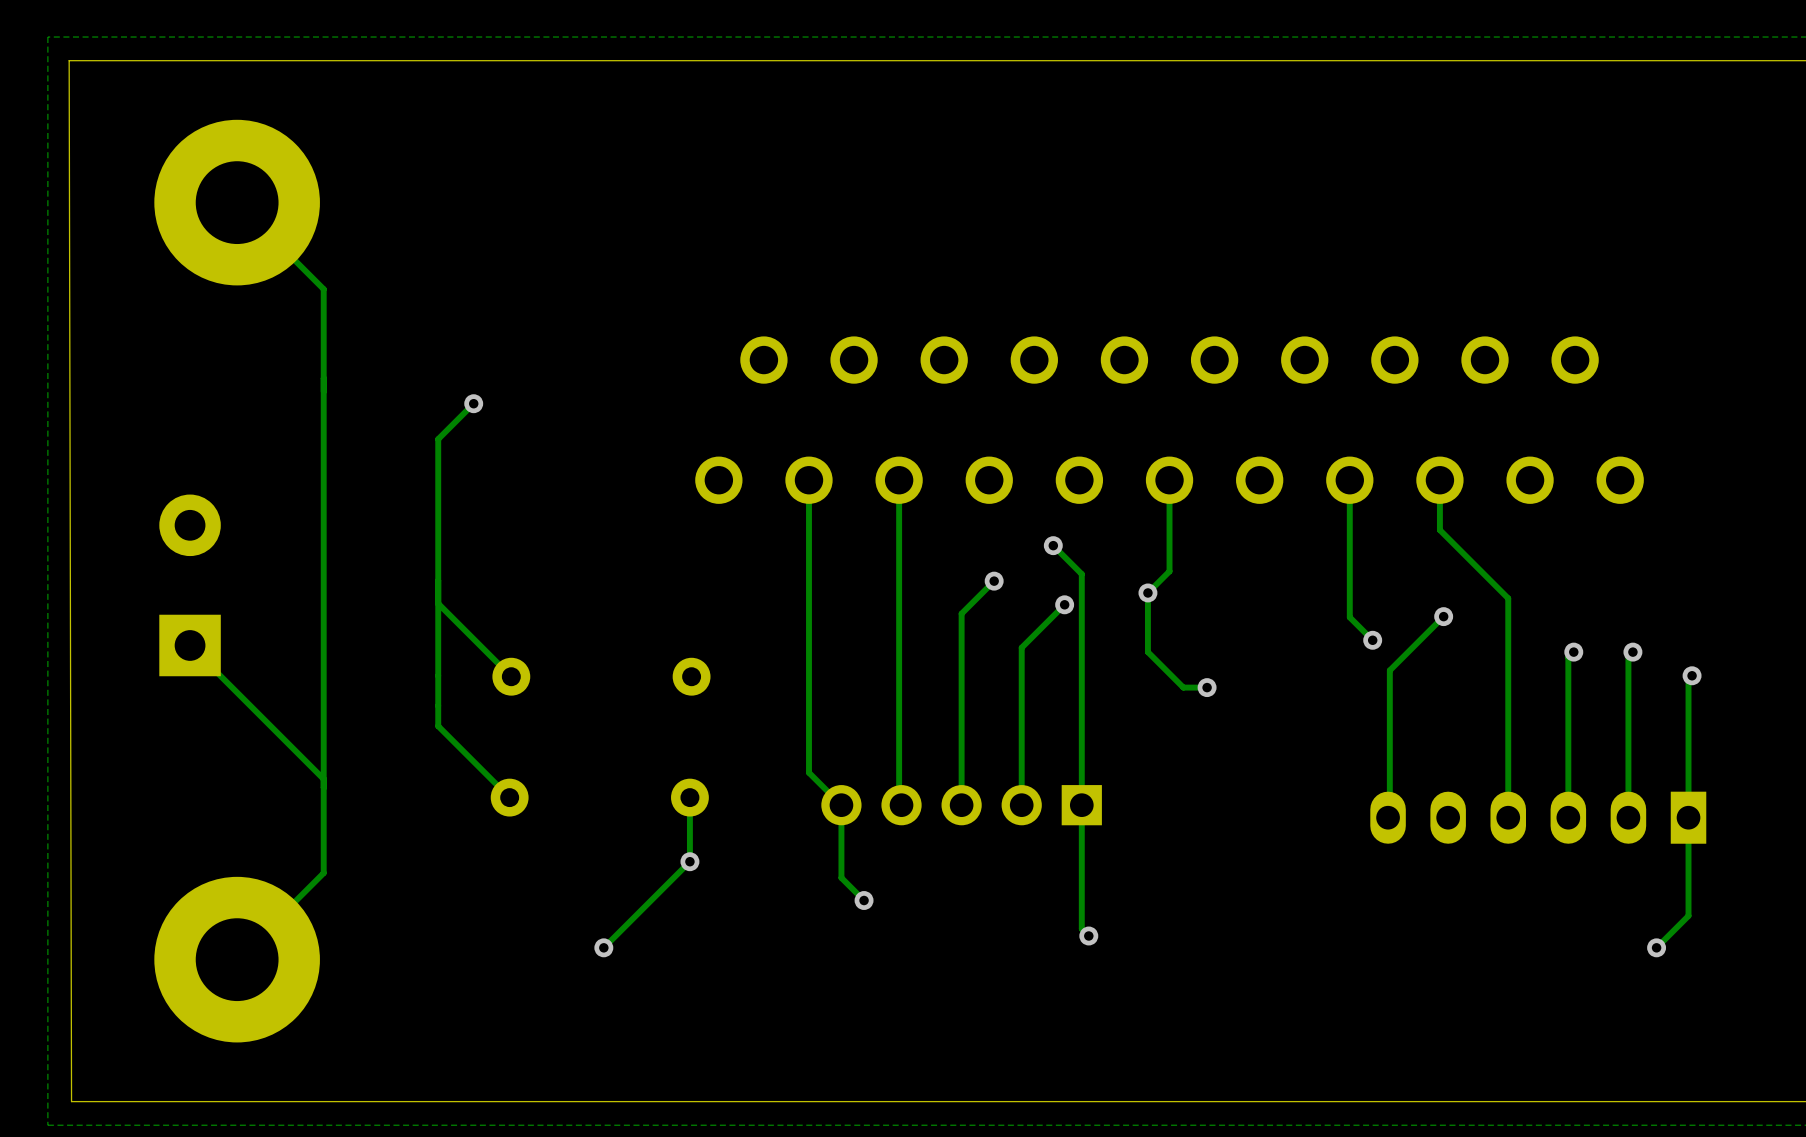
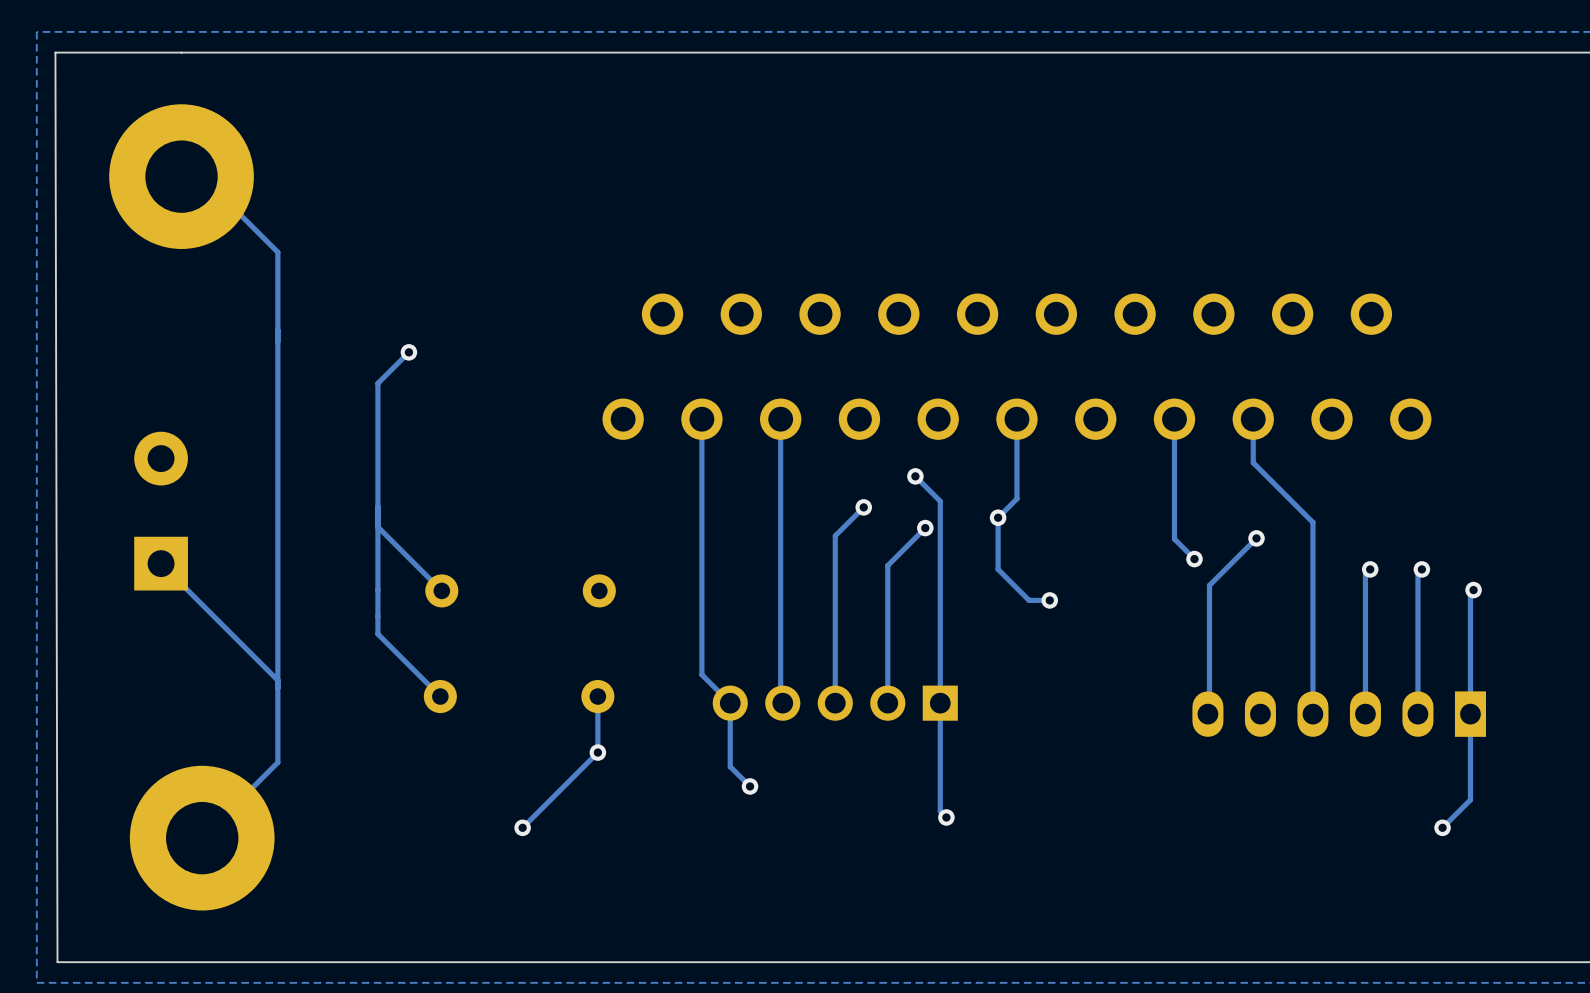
part position: (237, 202) -> (181, 176)

